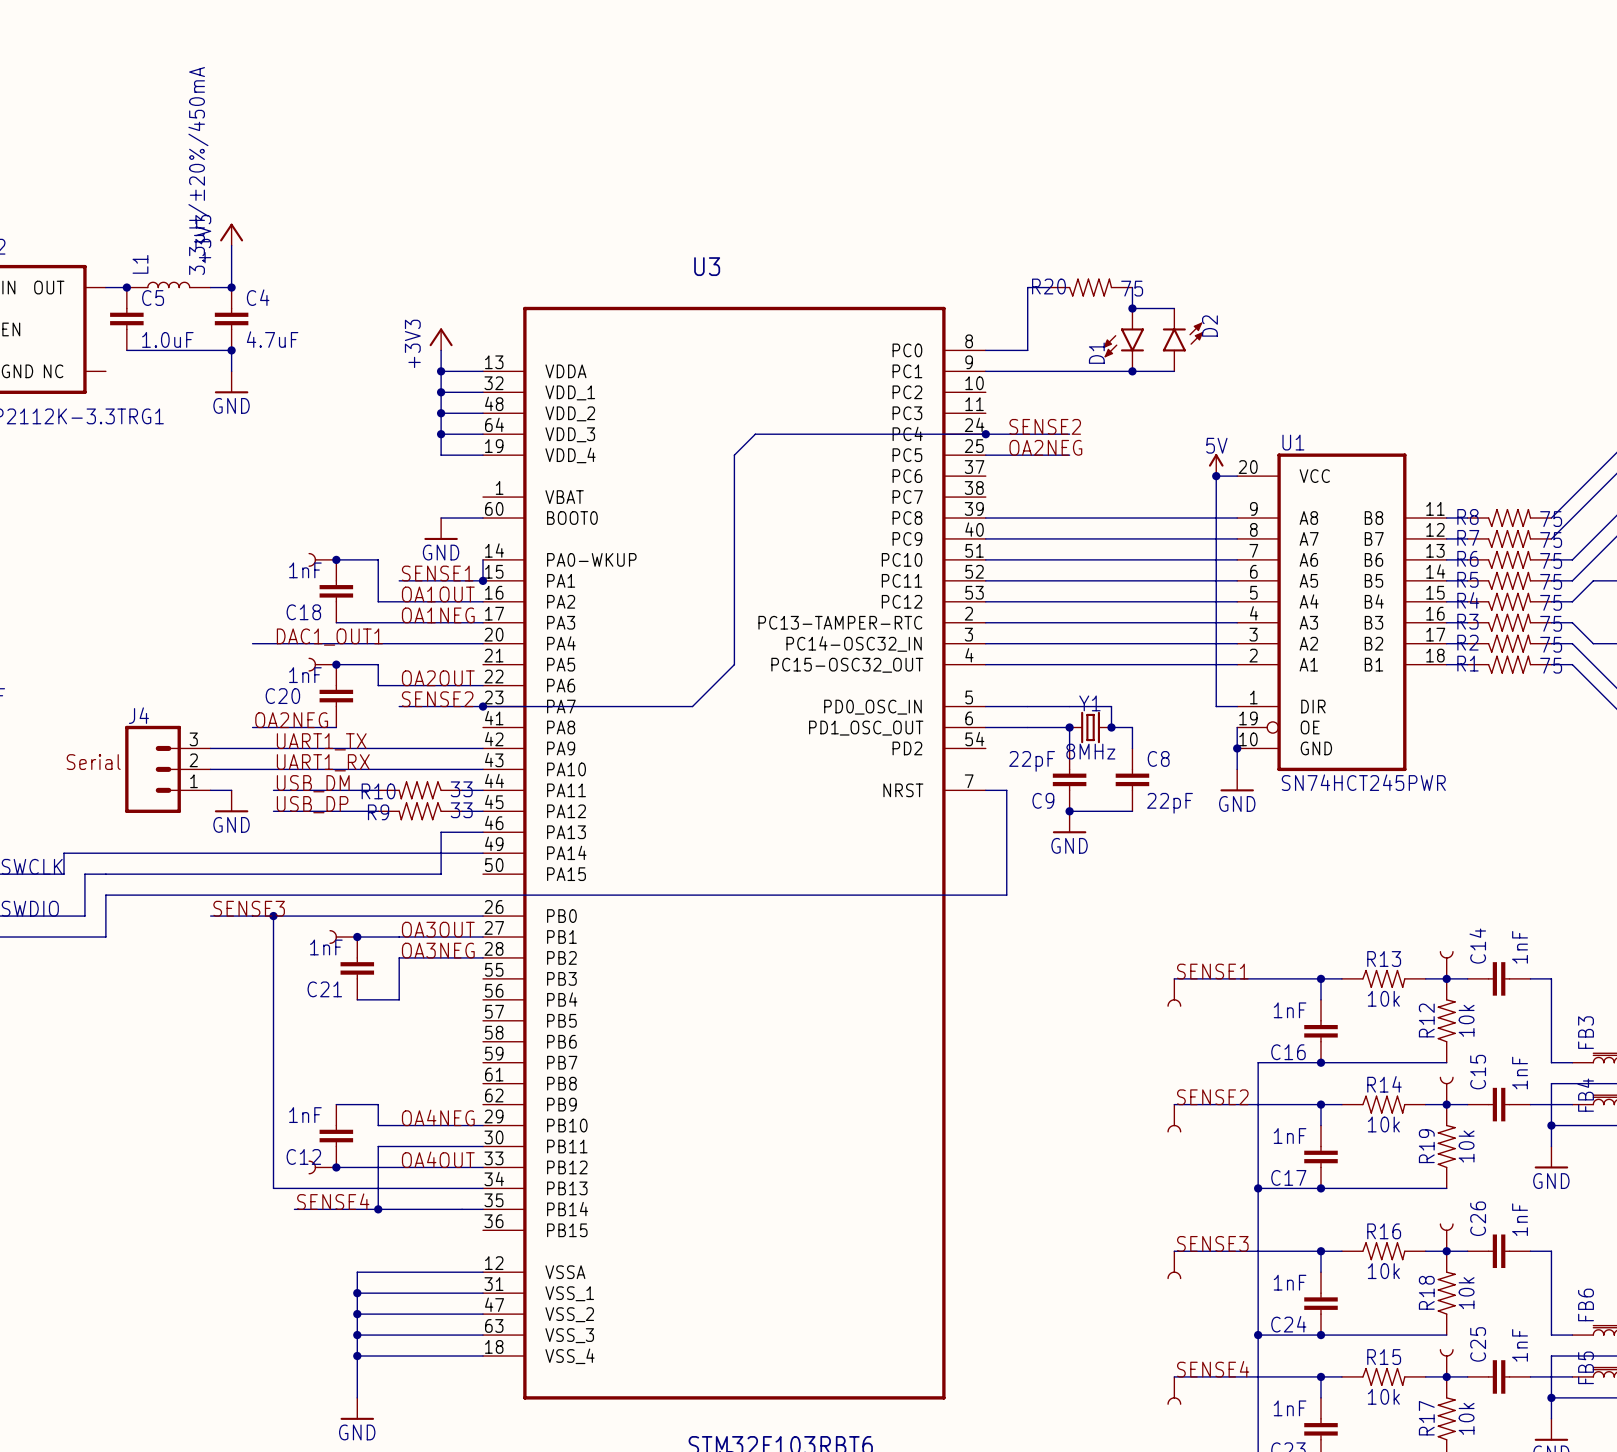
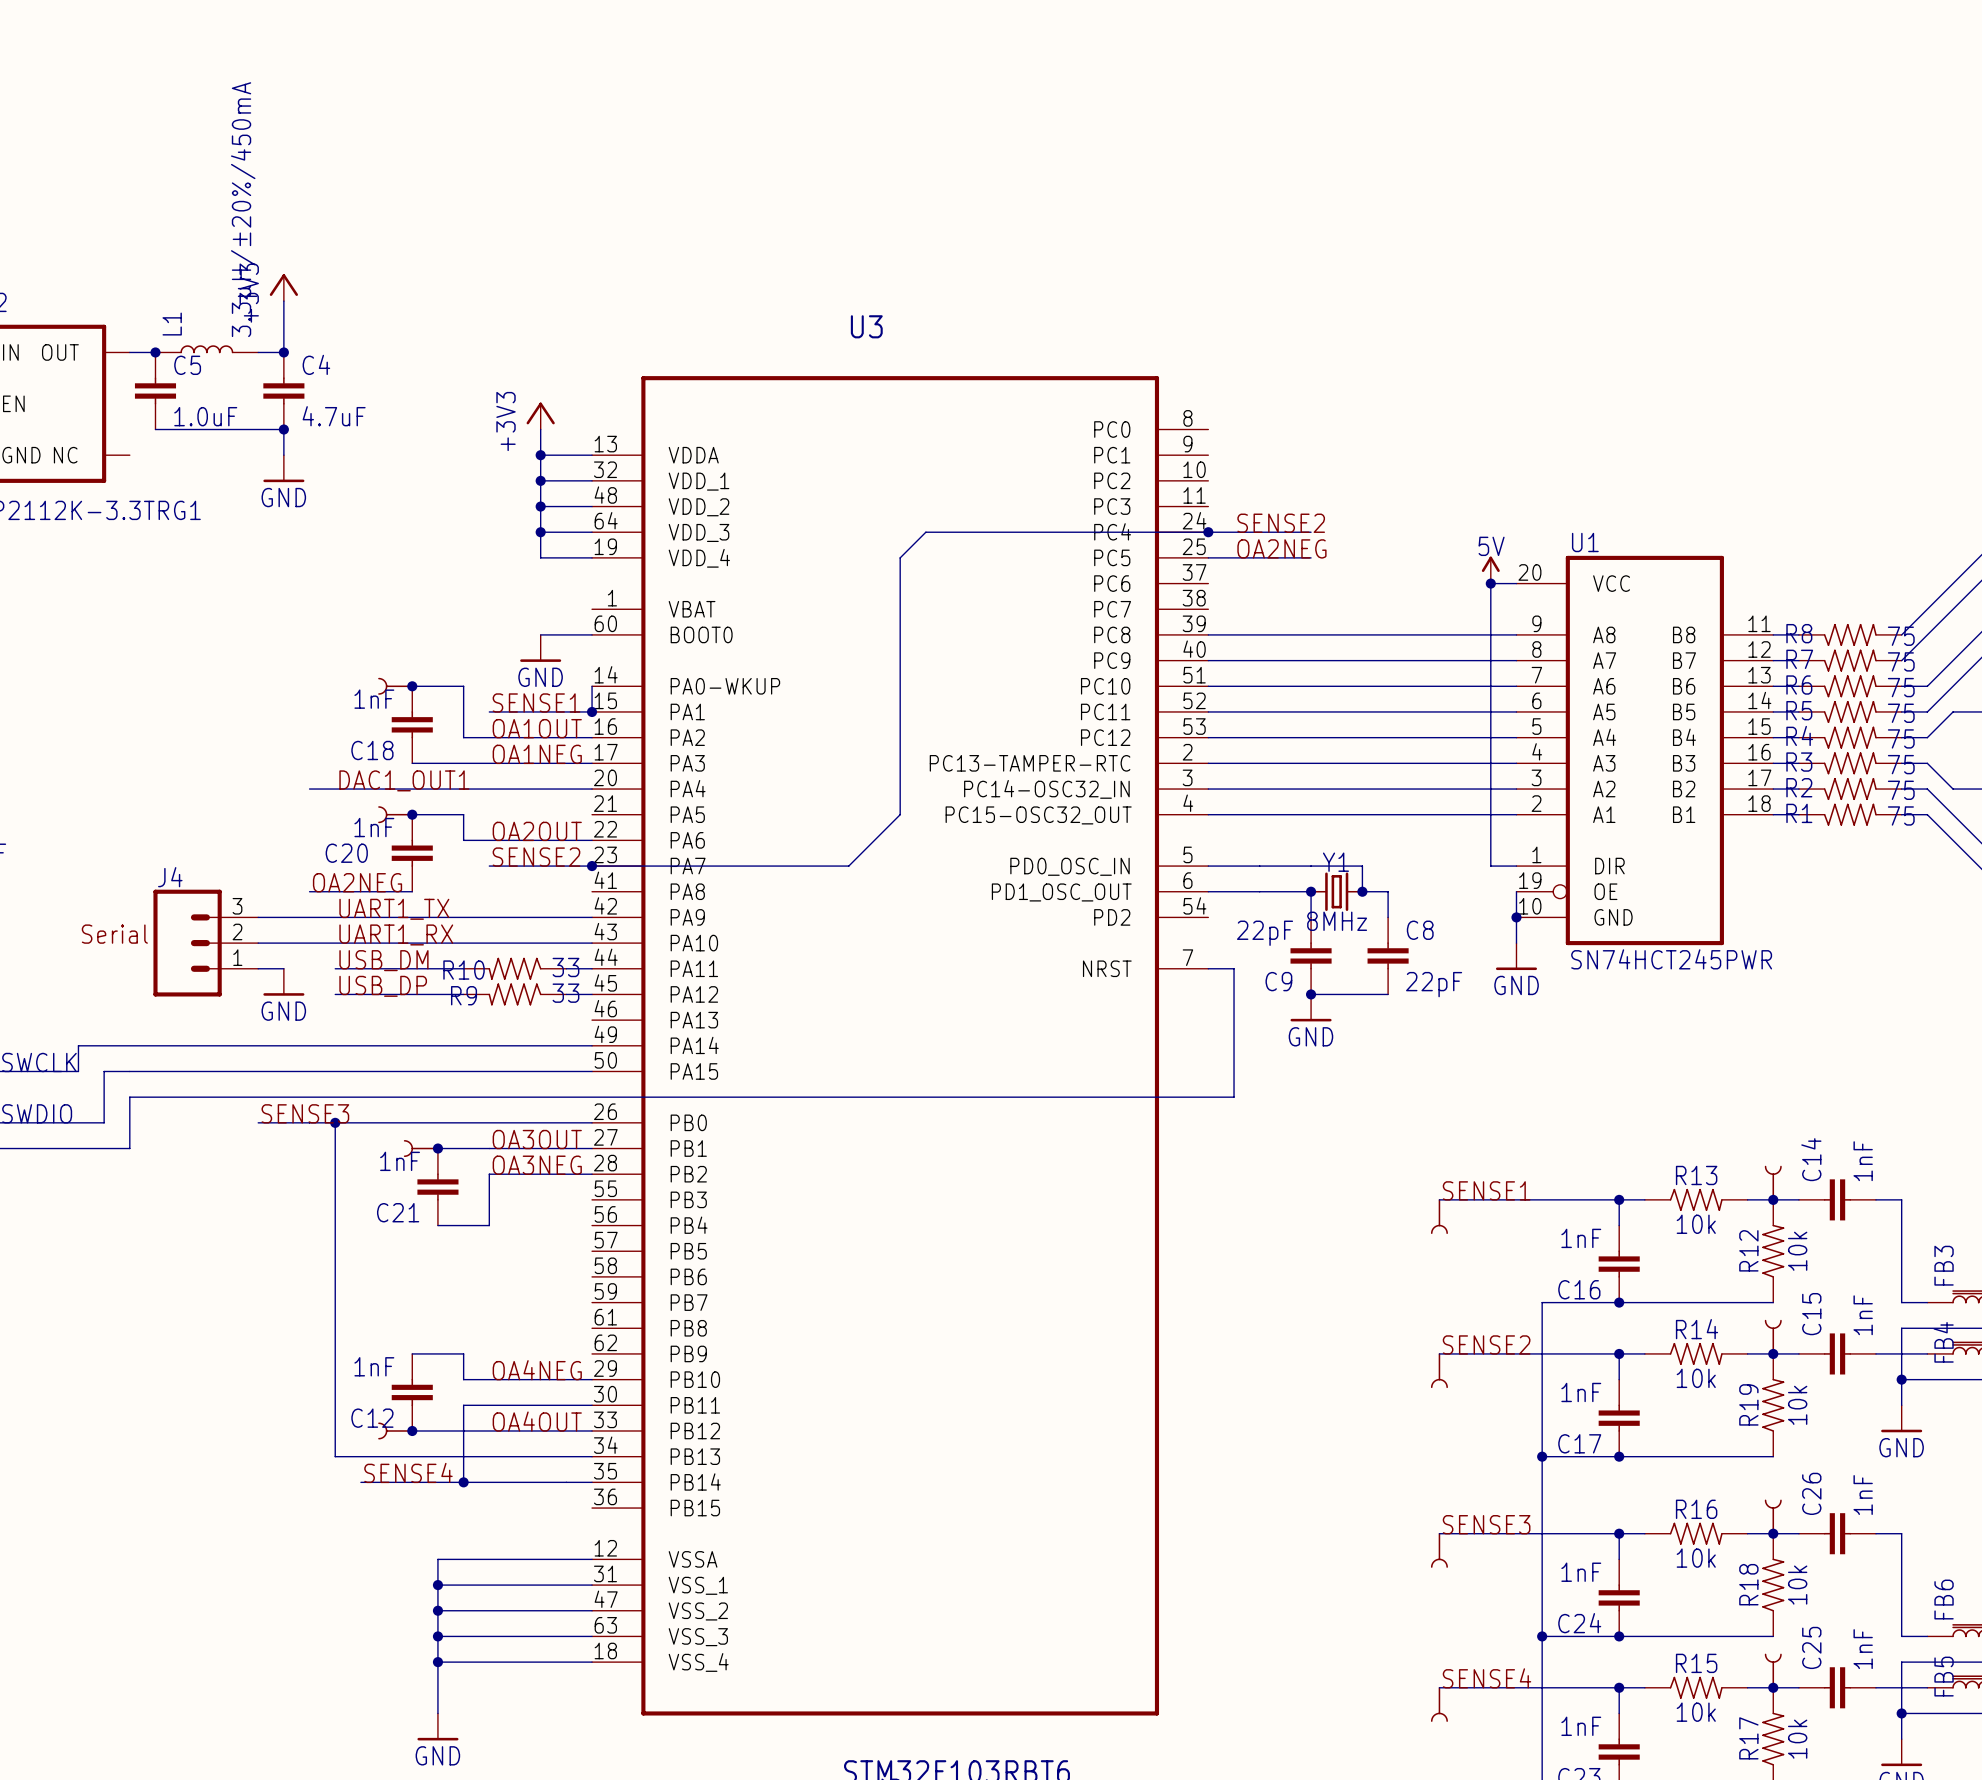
wire: (1048, 287) (1027, 287) (1027, 350) (985, 350) -> none
R20: 75 (1090, 287) -> none
wire: (1132, 287) (1132, 308) (1174, 308) -> none
junction: (1132, 308) -> none
D1: (1123, 339) -> none
D2: (1183, 339) -> none
wire: (985, 371) (1174, 371) -> none
junction: (1132, 371) -> none
wire: (483, 832) (441, 832) (441, 874) -> (592, 1071) (540, 1071)

